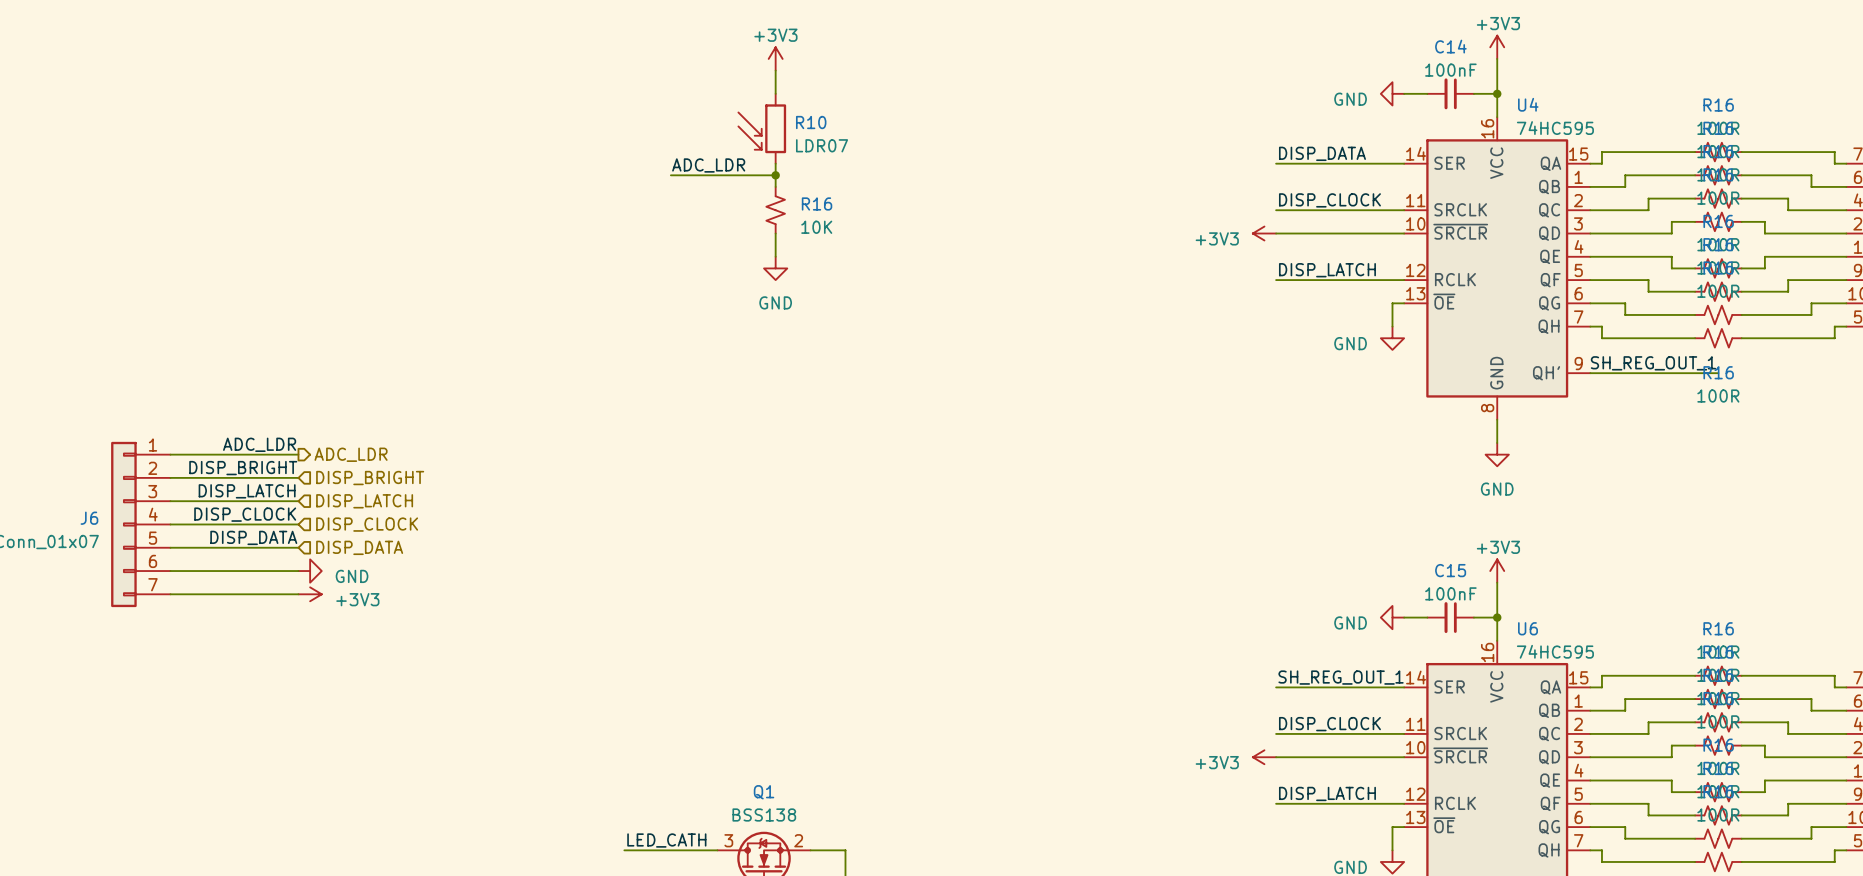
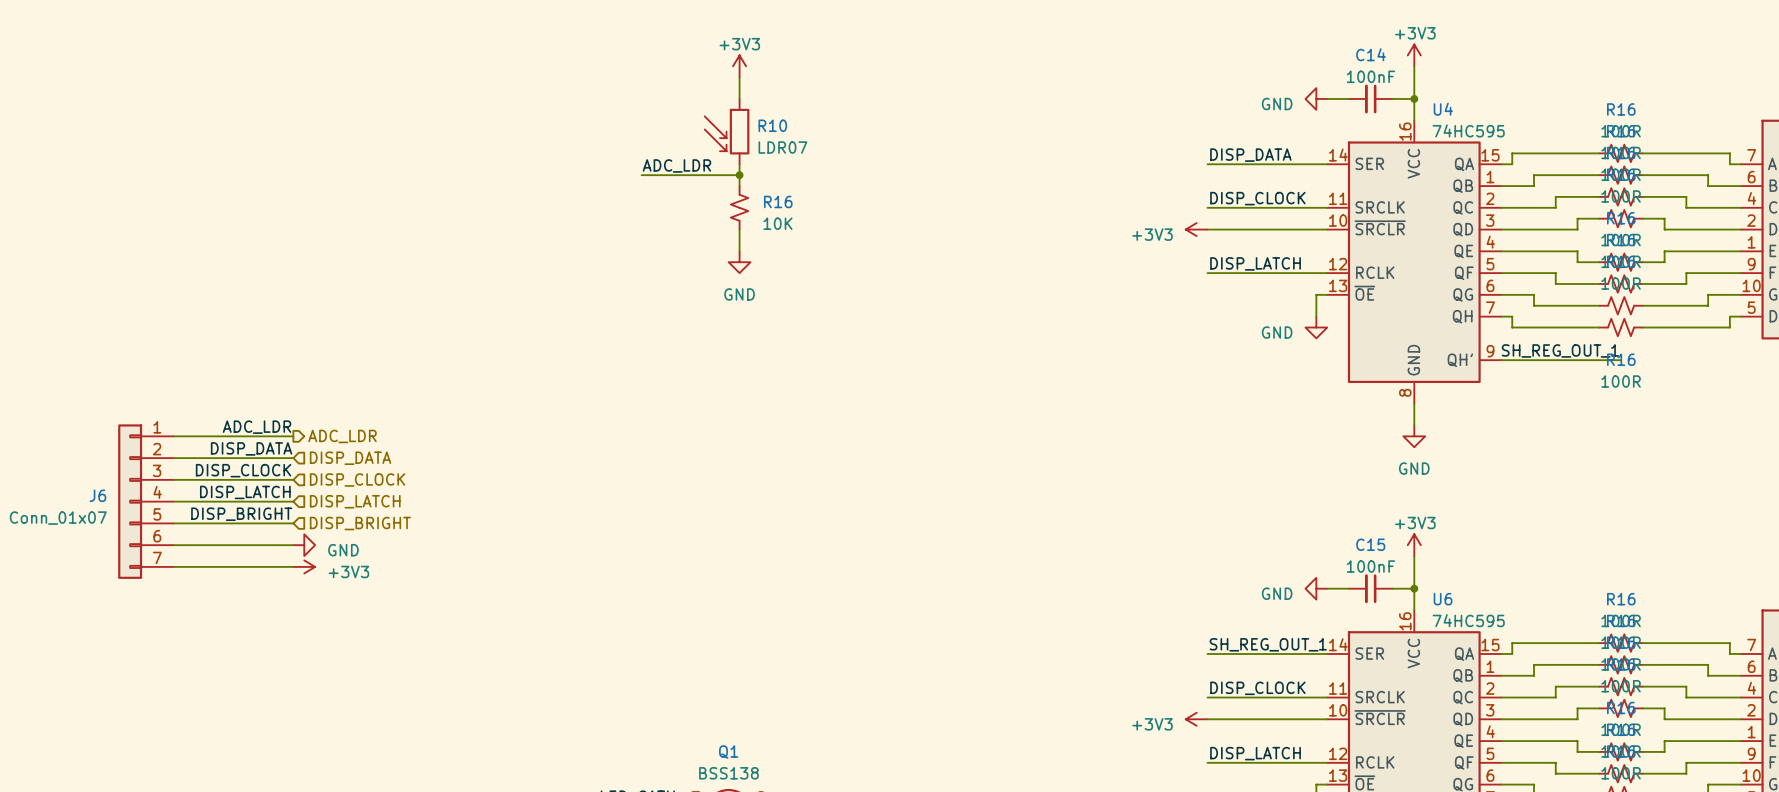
label: DISP_BRIGHT (243, 468) -> DISP_DATA (251, 448)
hierarchical label: DISP_BRIGHT (370, 478) -> DISP_DATA (350, 458)
label: DISP_LATCH (247, 491) -> DISP_CLOCK (243, 470)
hierarchical label: DISP_LATCH (364, 501) -> DISP_CLOCK (357, 479)
label: DISP_CLOCK (245, 514) -> DISP_LATCH (245, 492)
hierarchical label: DISP_CLOCK (367, 524) -> DISP_LATCH (355, 501)
label: DISP_DATA (253, 537) -> DISP_BRIGHT (241, 514)
hierarchical label: DISP_DATA (359, 547) -> DISP_BRIGHT (360, 523)

